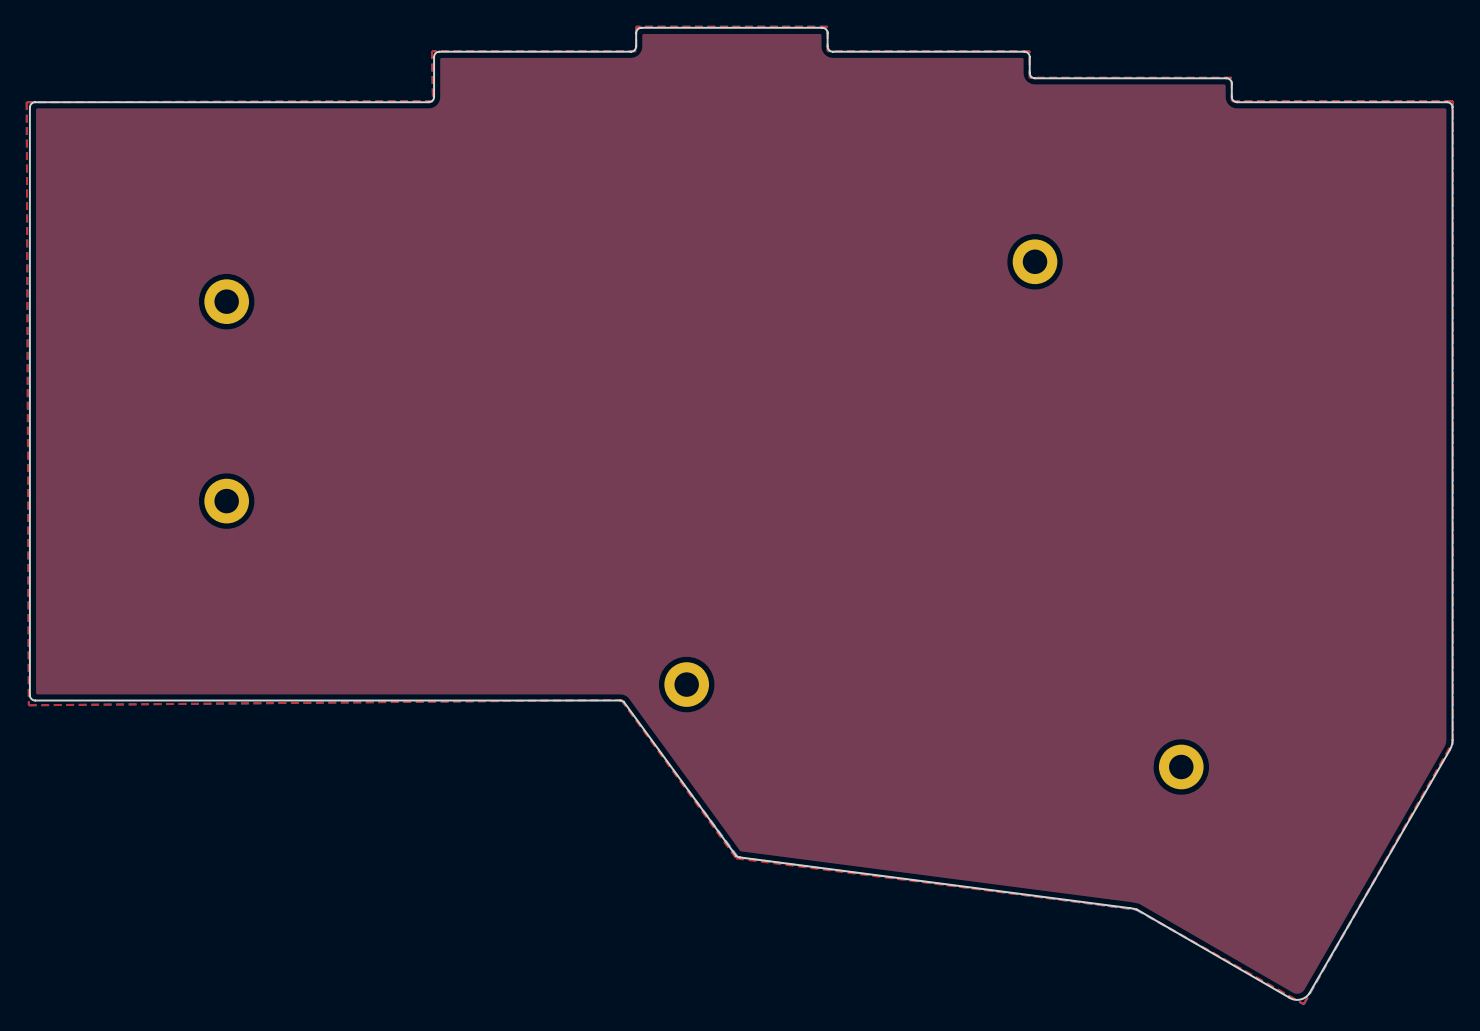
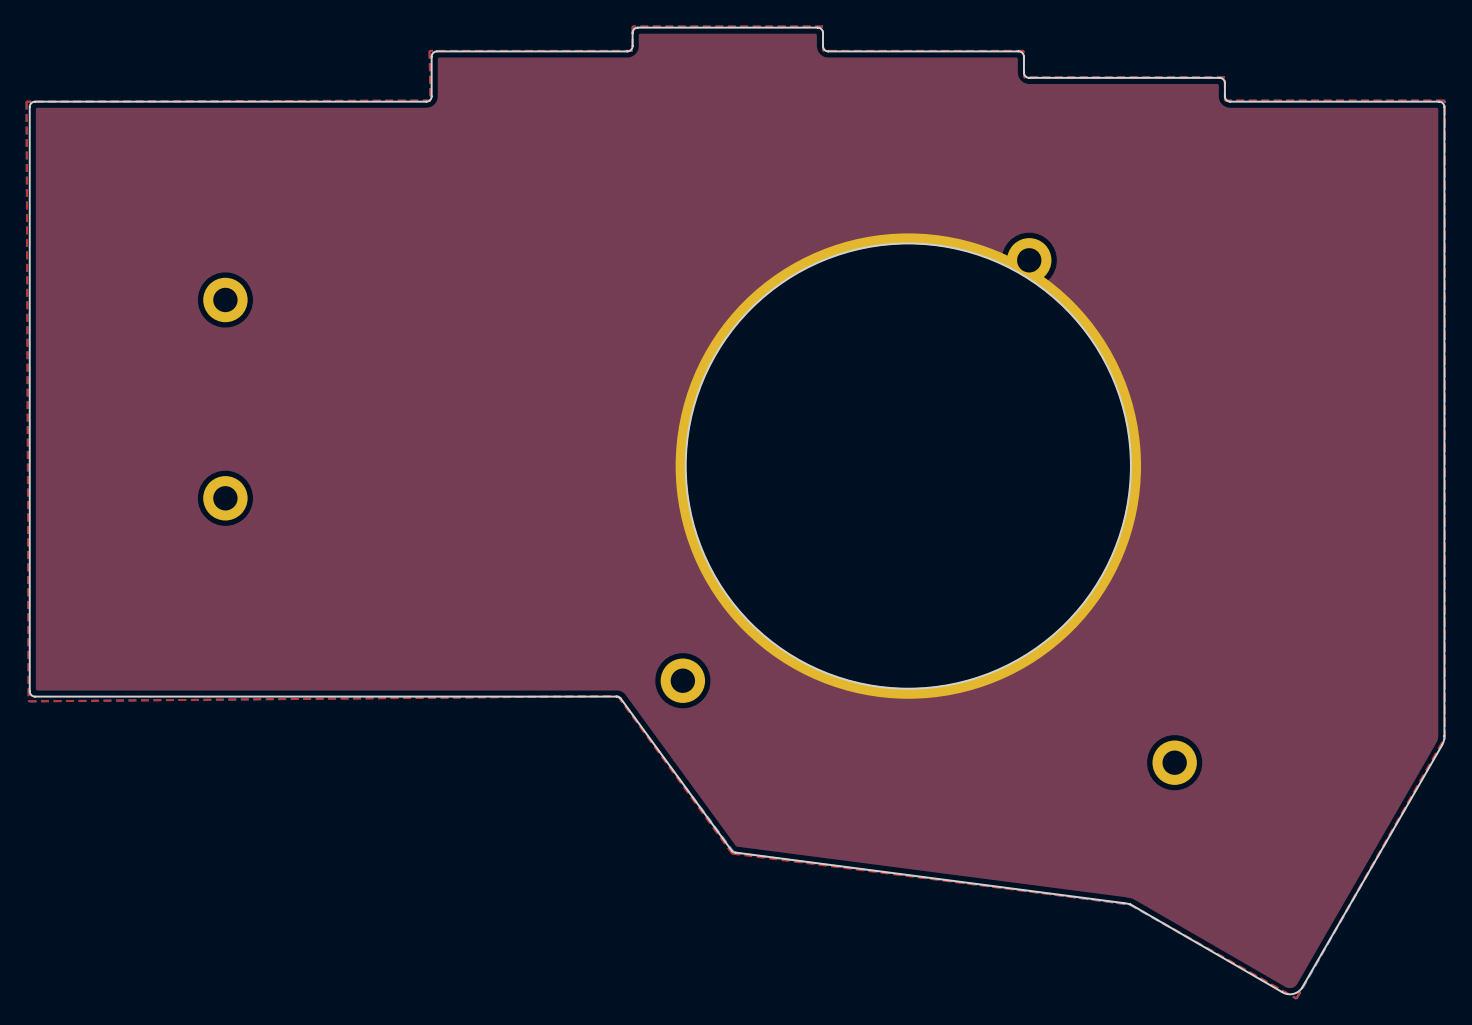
round board edge: none -> [684, 242, 1132, 690]
part: none -> (908, 466)

